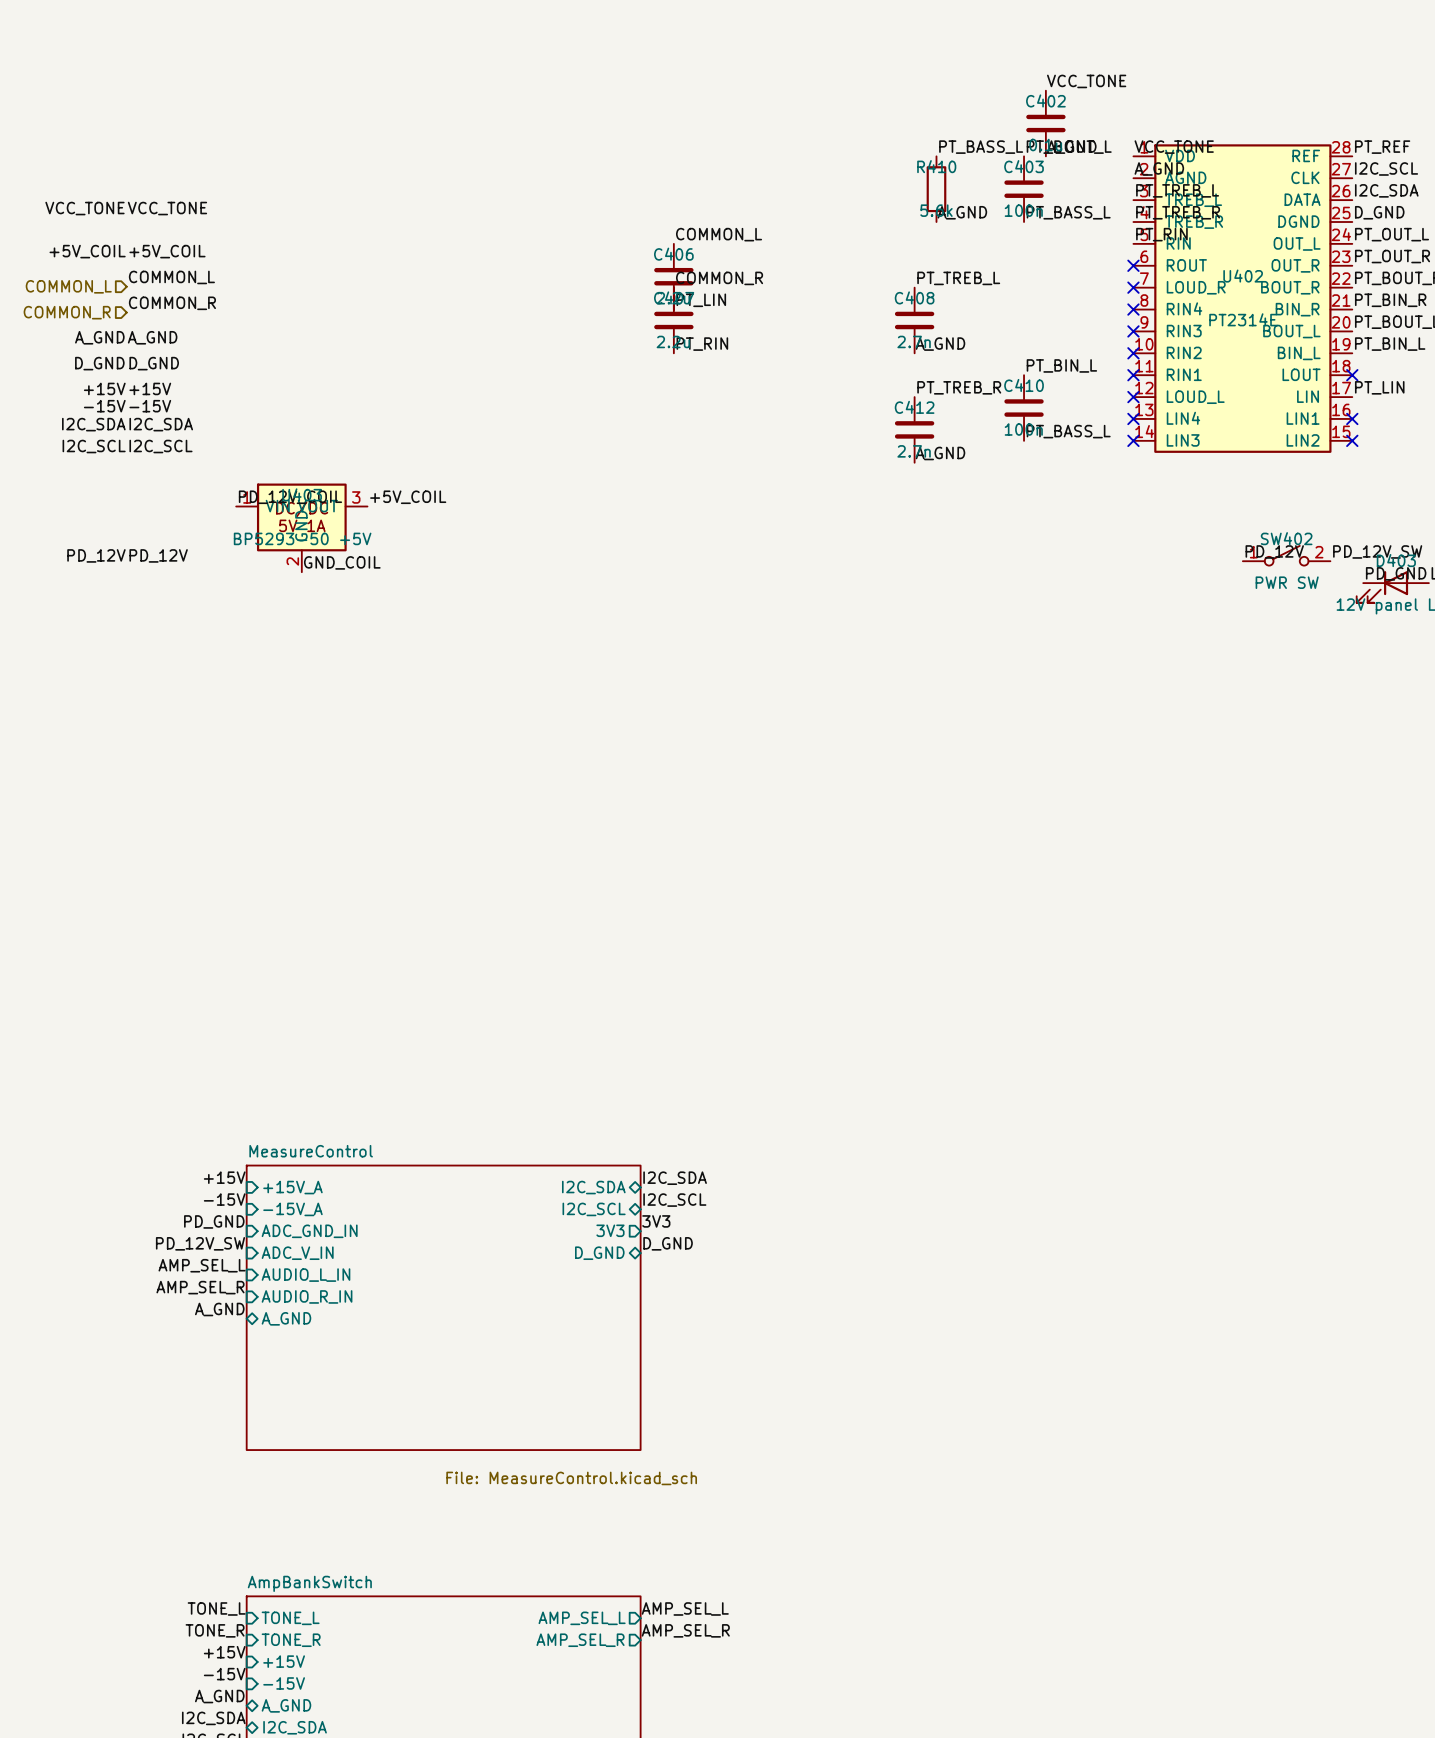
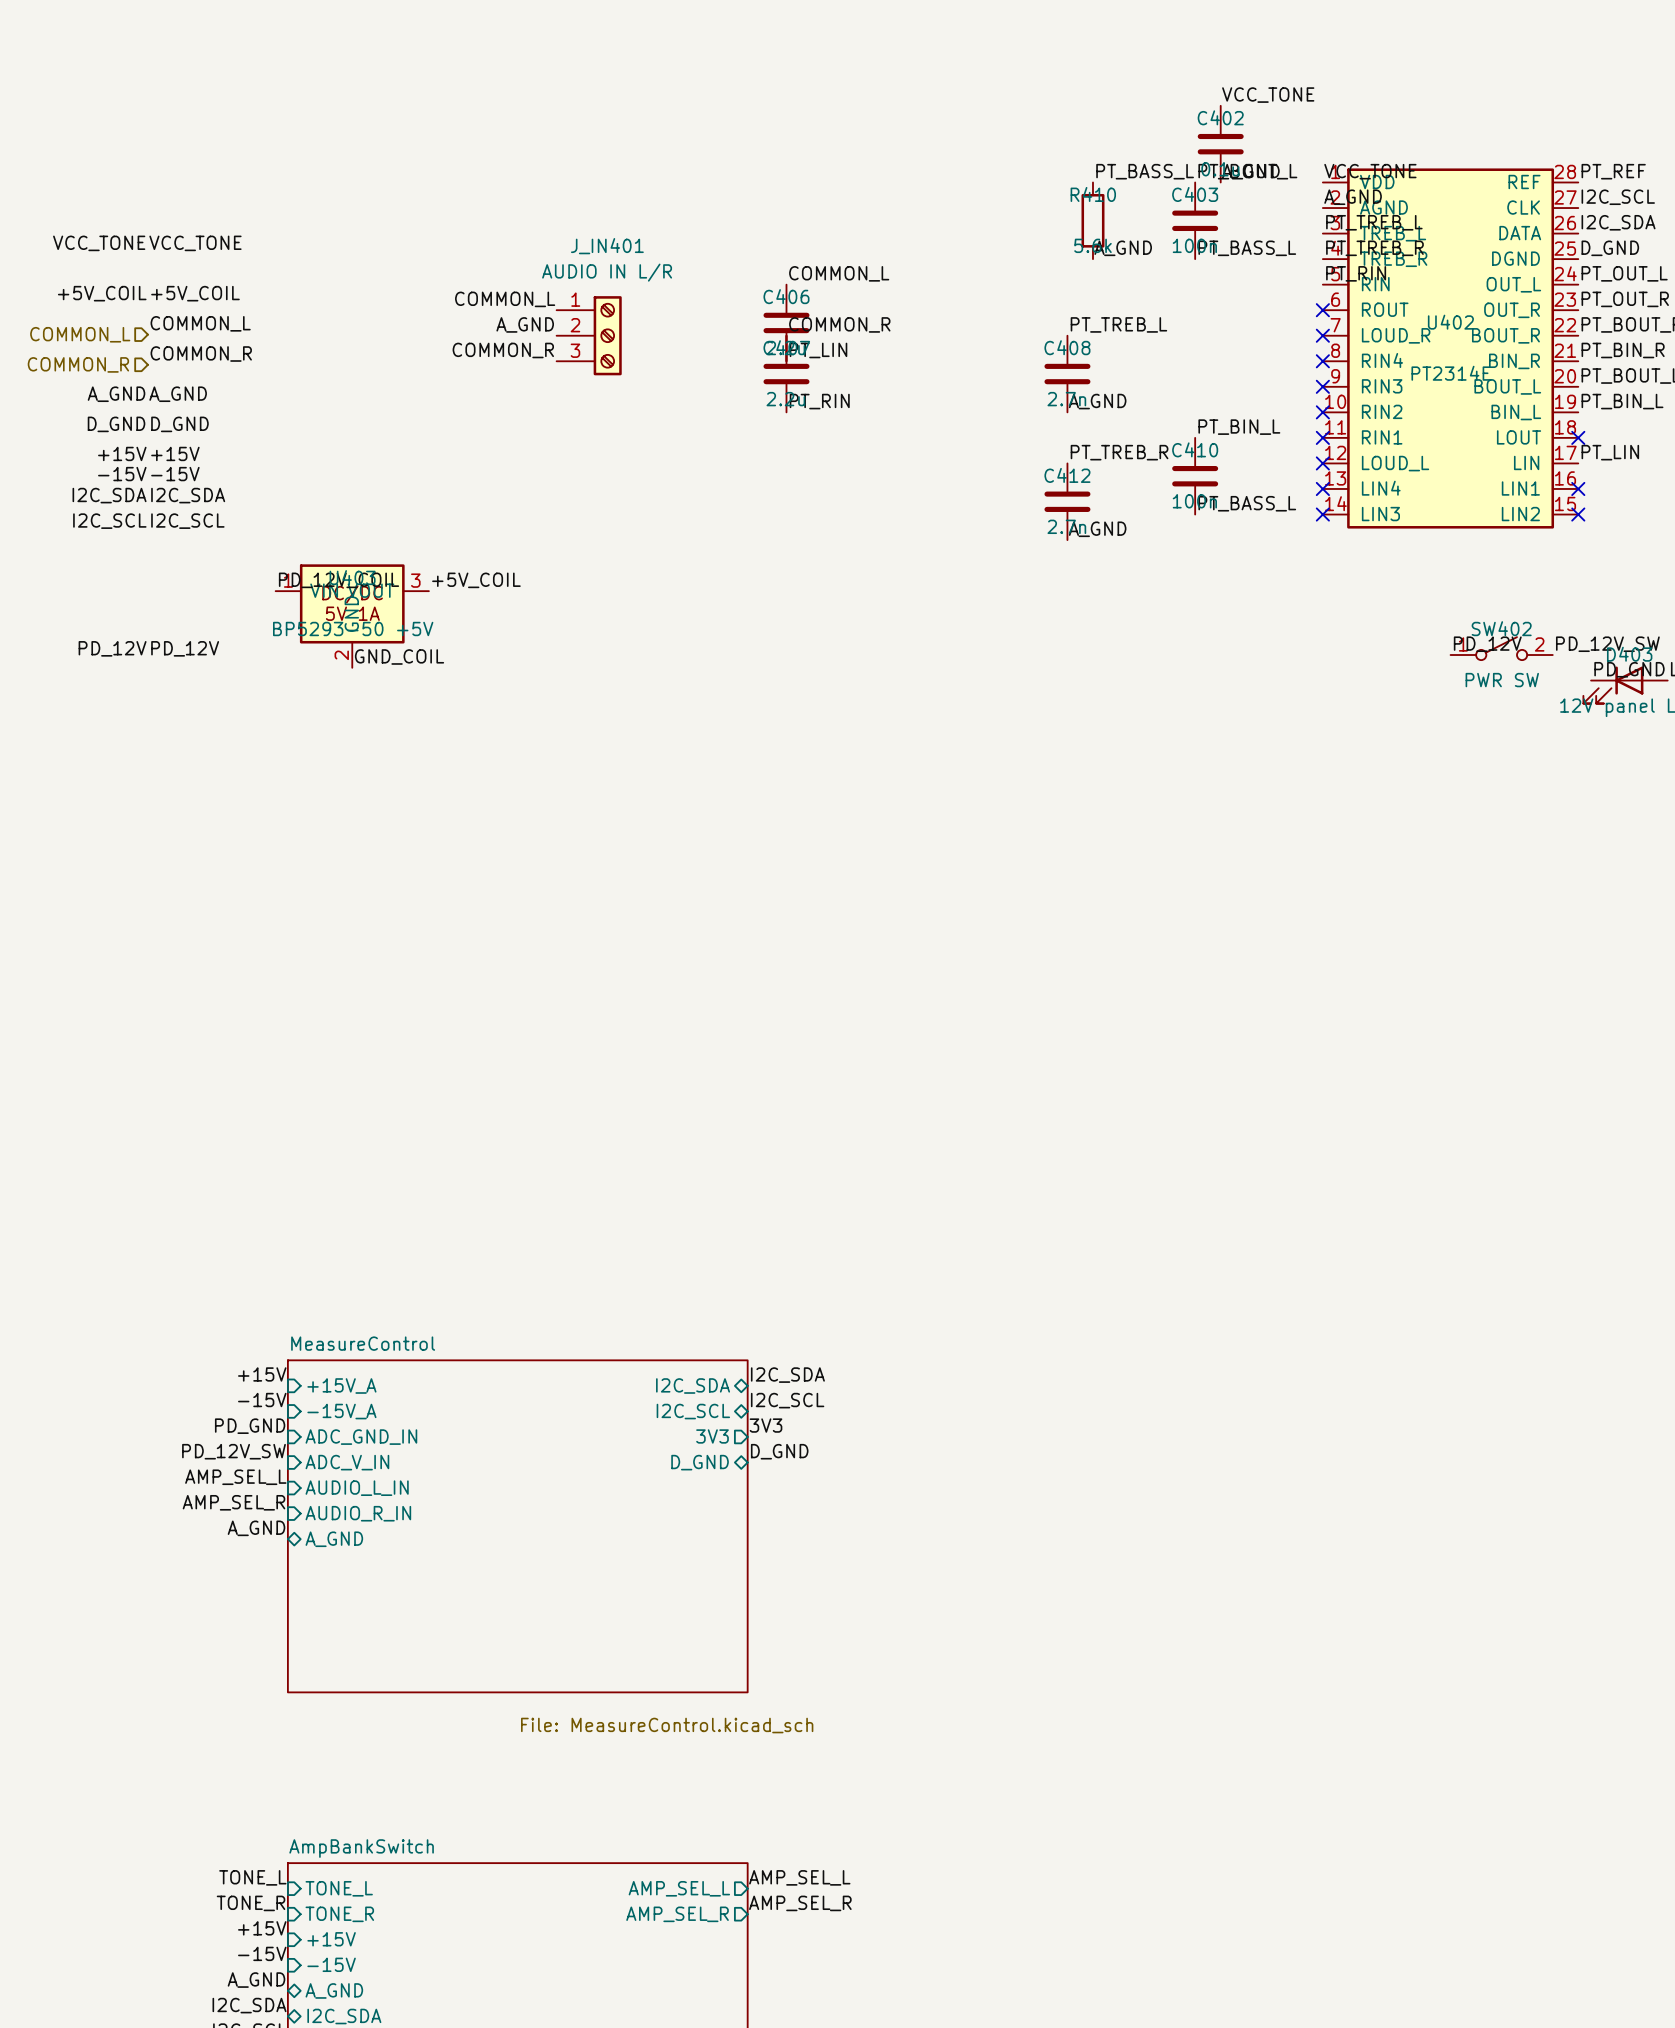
label: none -> COMMON_L (505, 299)
label: none -> A_GND (525, 324)
J_IN401: none -> AUDIO IN L/R (589, 335)
label: none -> COMMON_R (503, 350)

